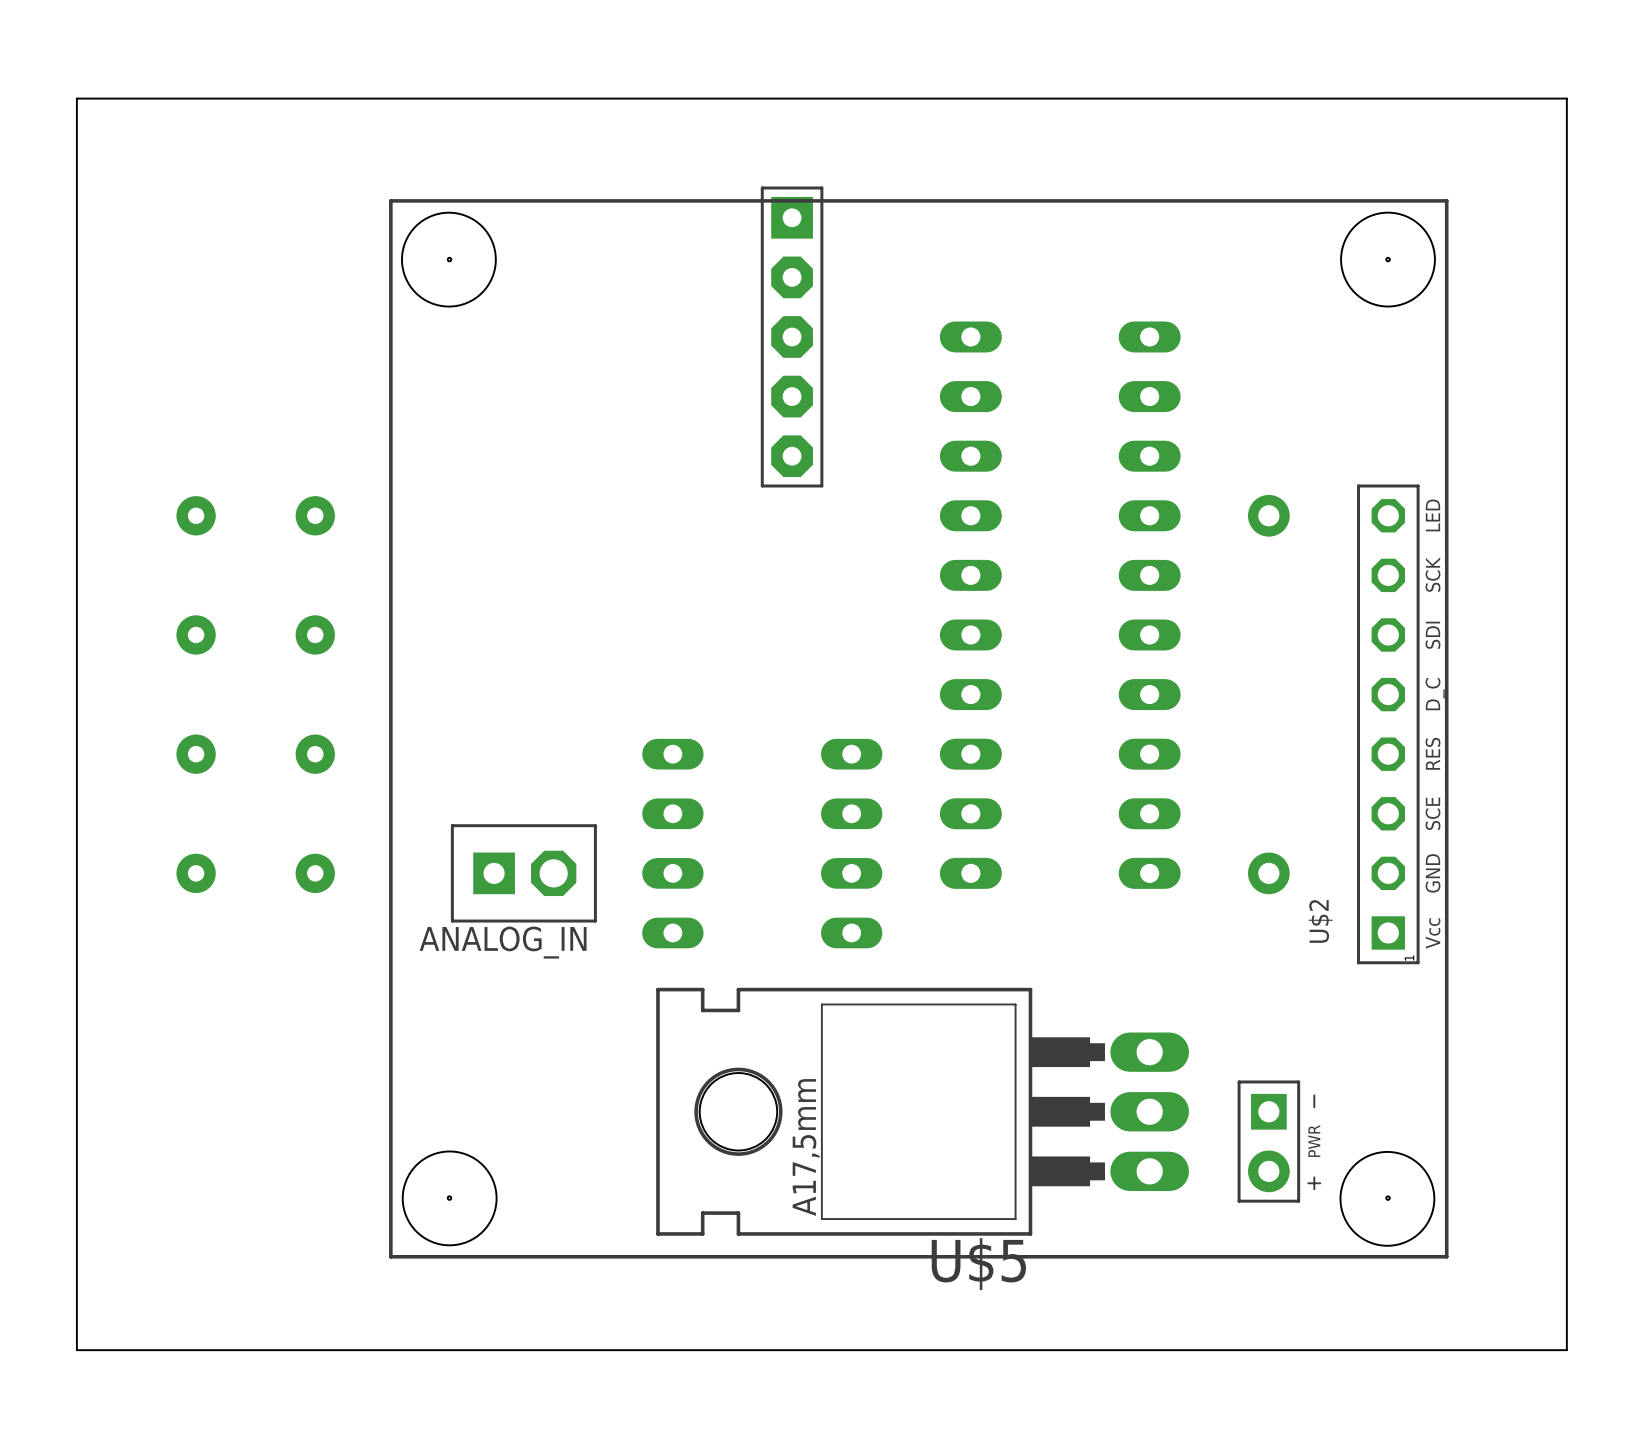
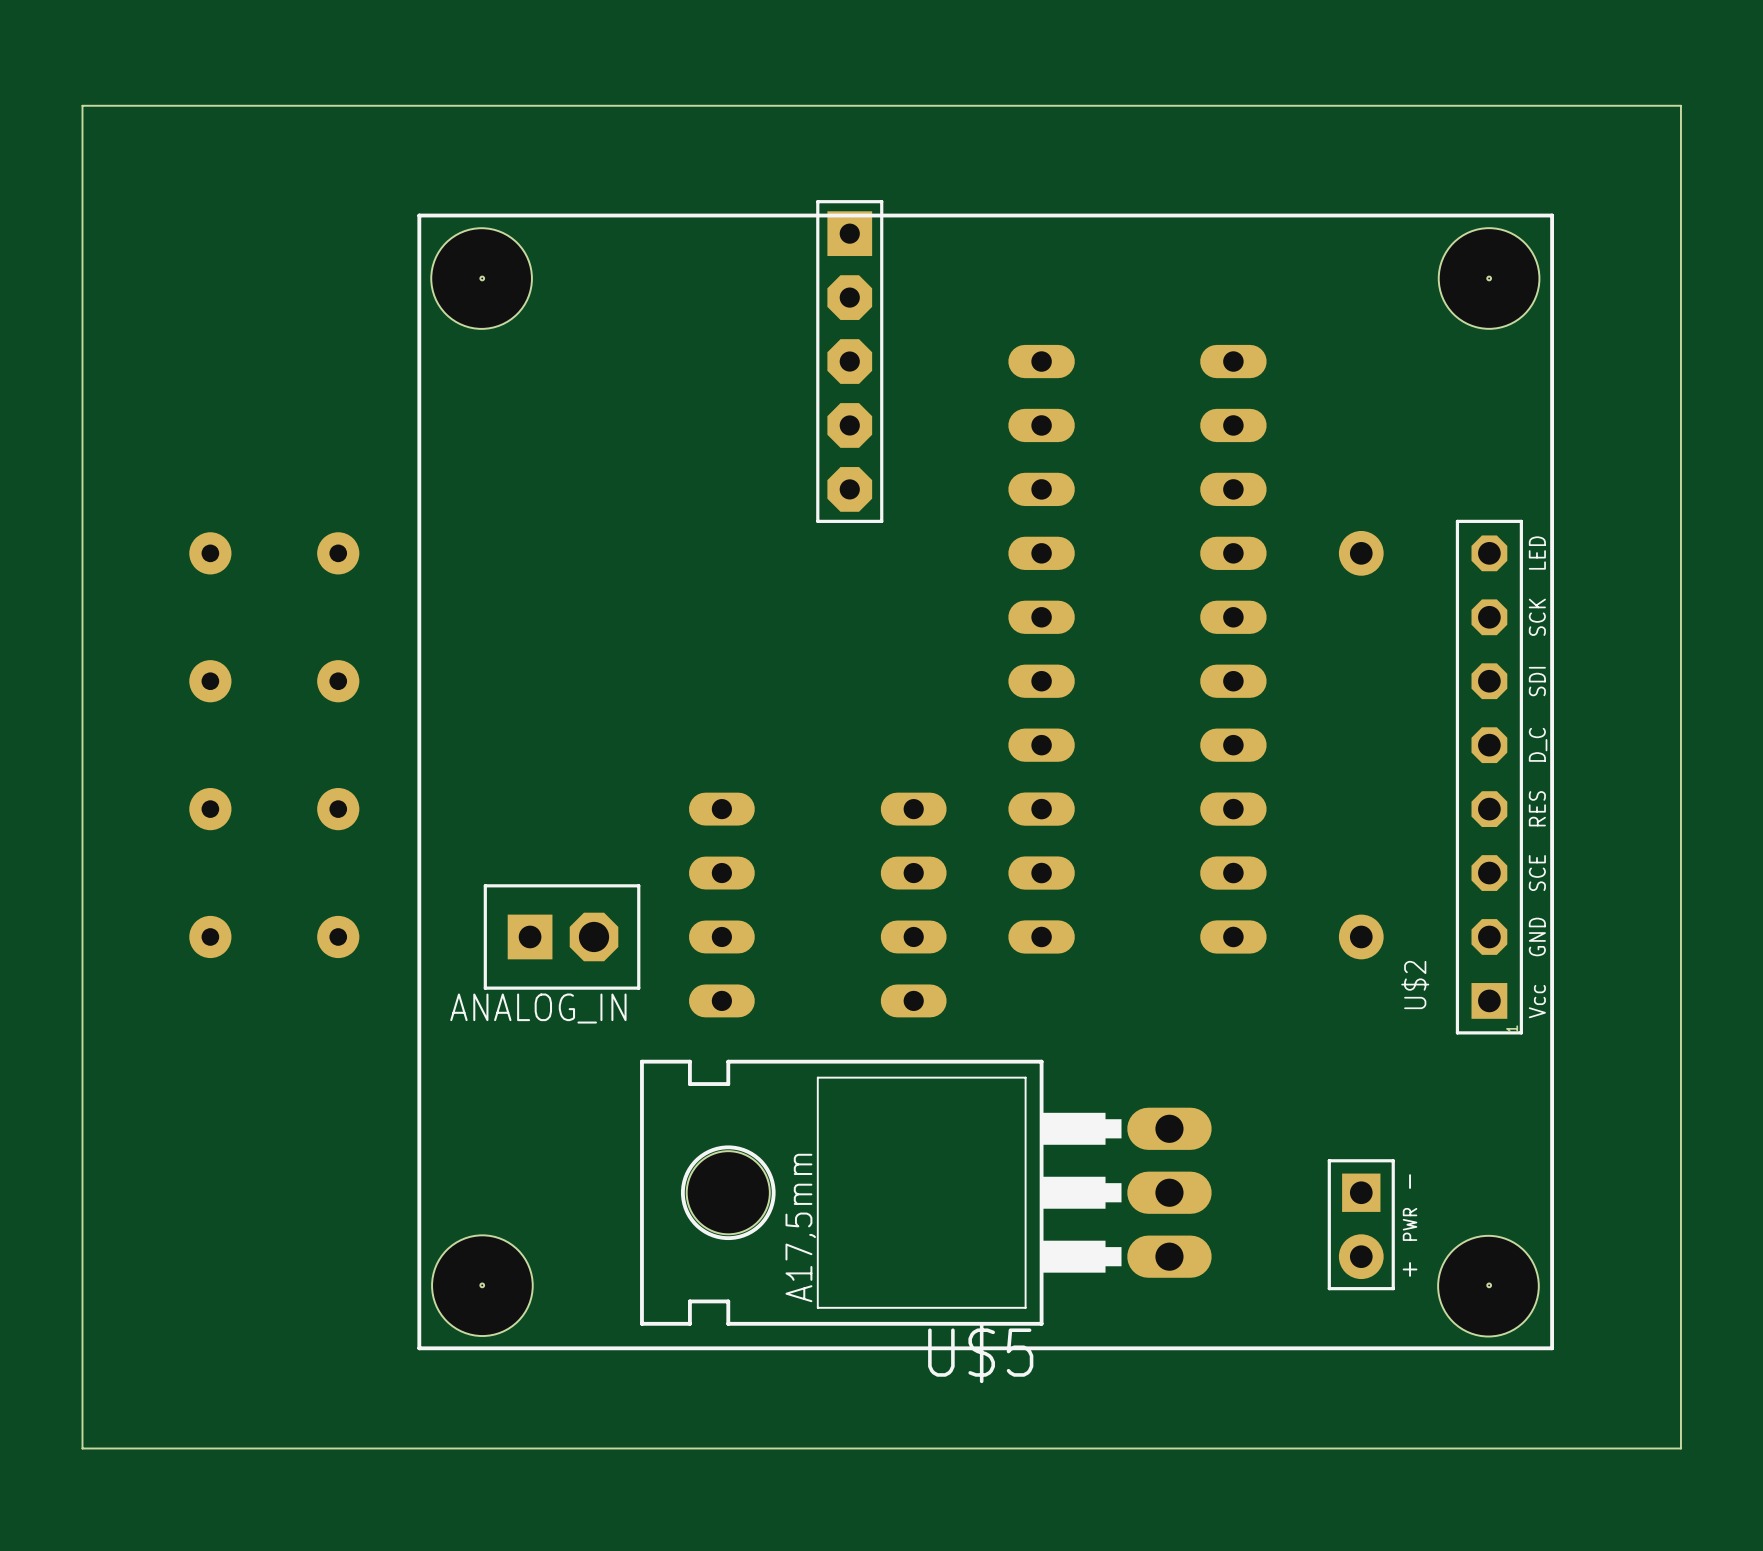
U$5 position: (922, 1111) -> (925, 1192)

